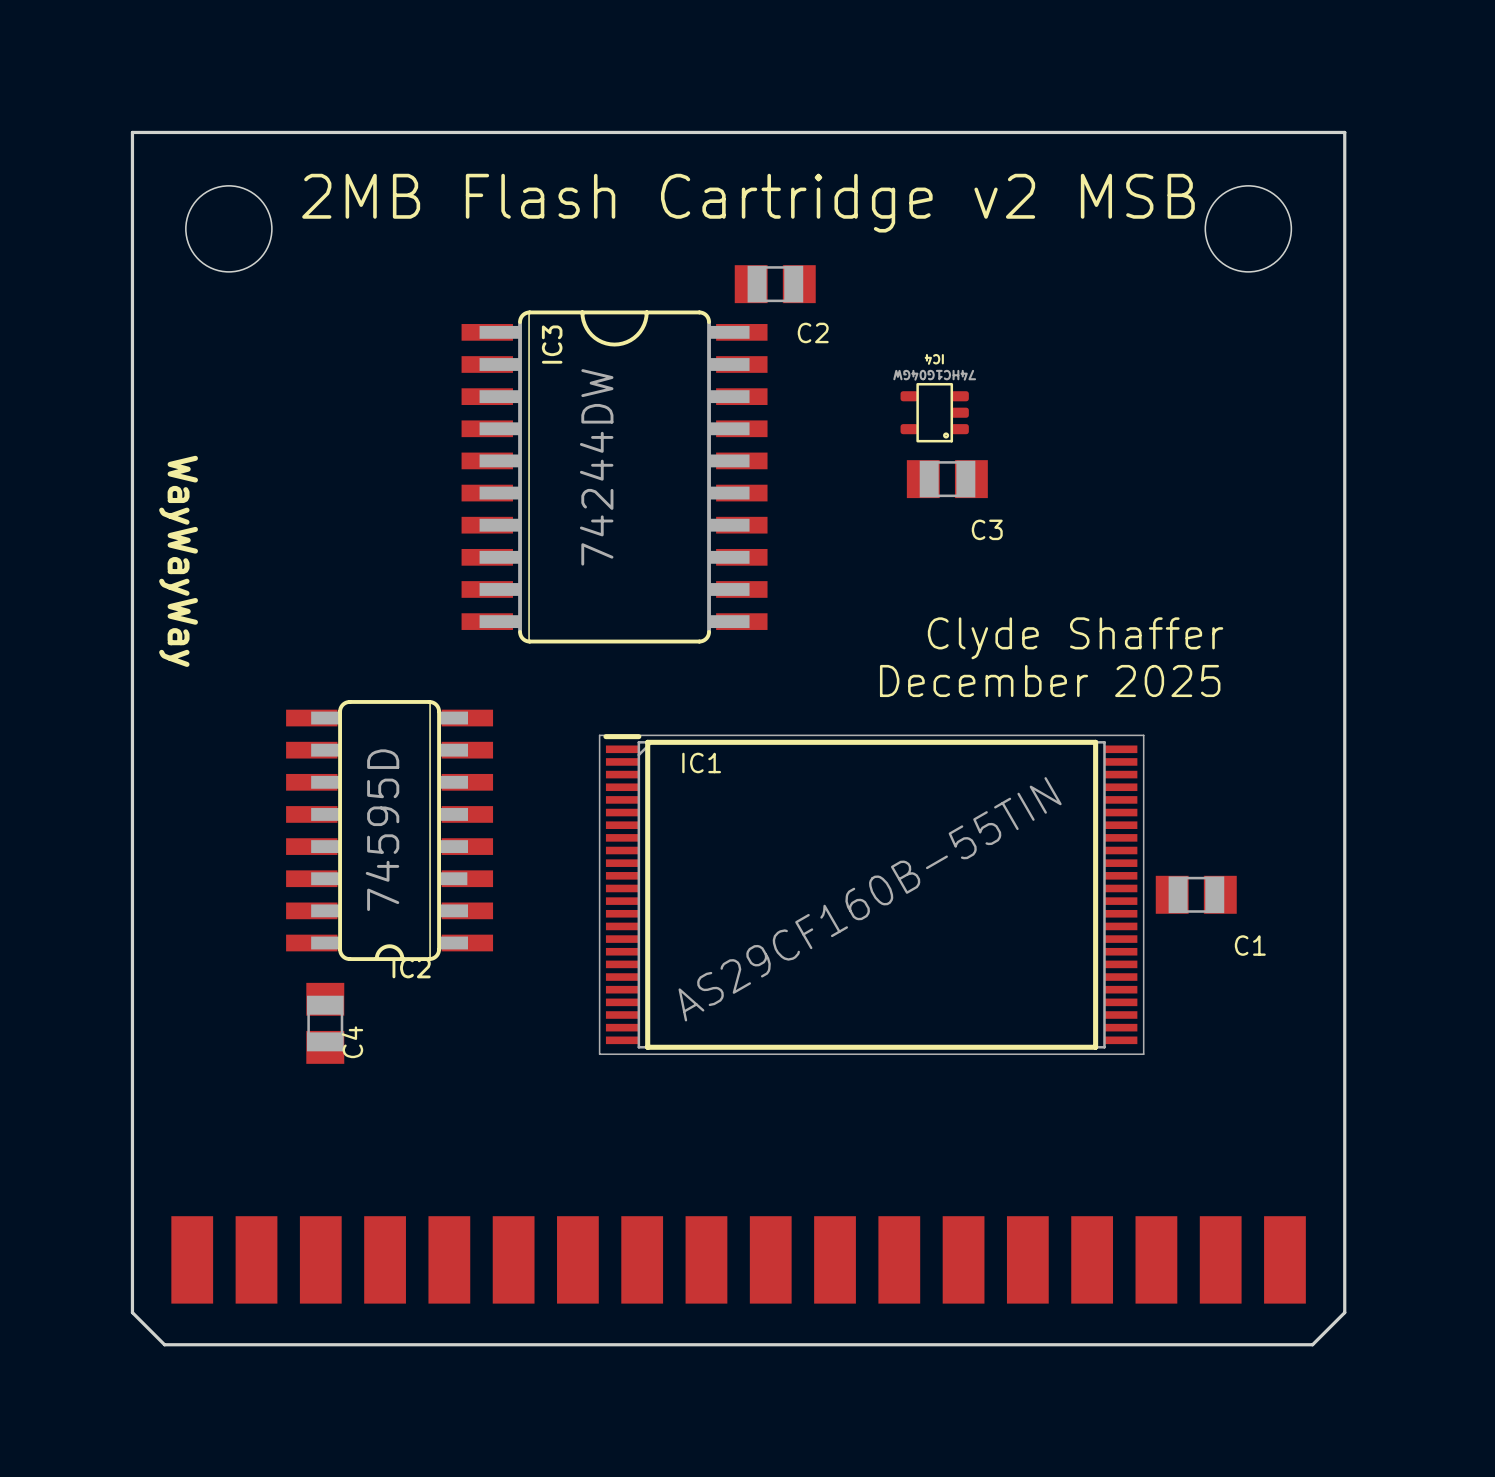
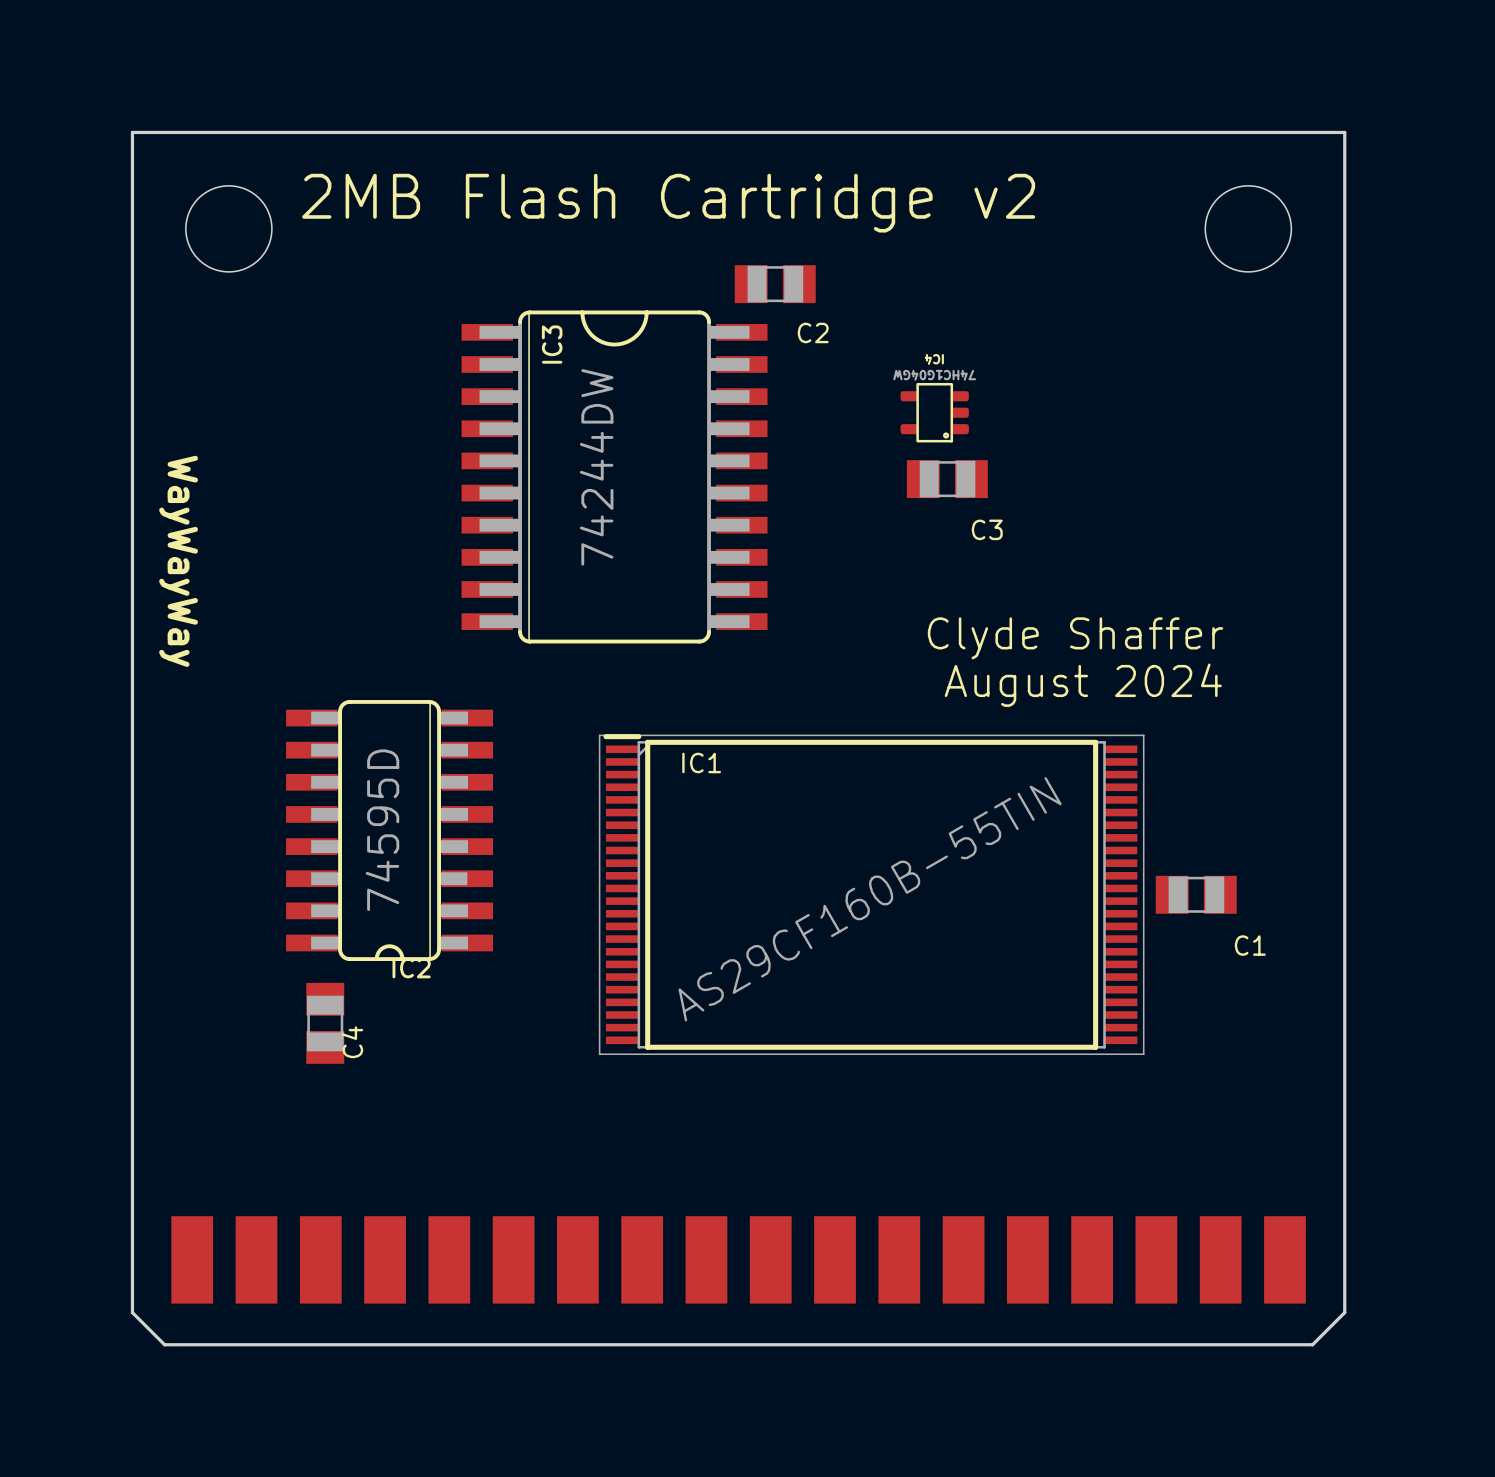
text: 2MB Flash Cartridge v2 MSB (748, 203) -> 2MB Flash Cartridge v2 (668, 203)
text: December 2025 (1050, 680) -> August 2024 (1083, 685)

